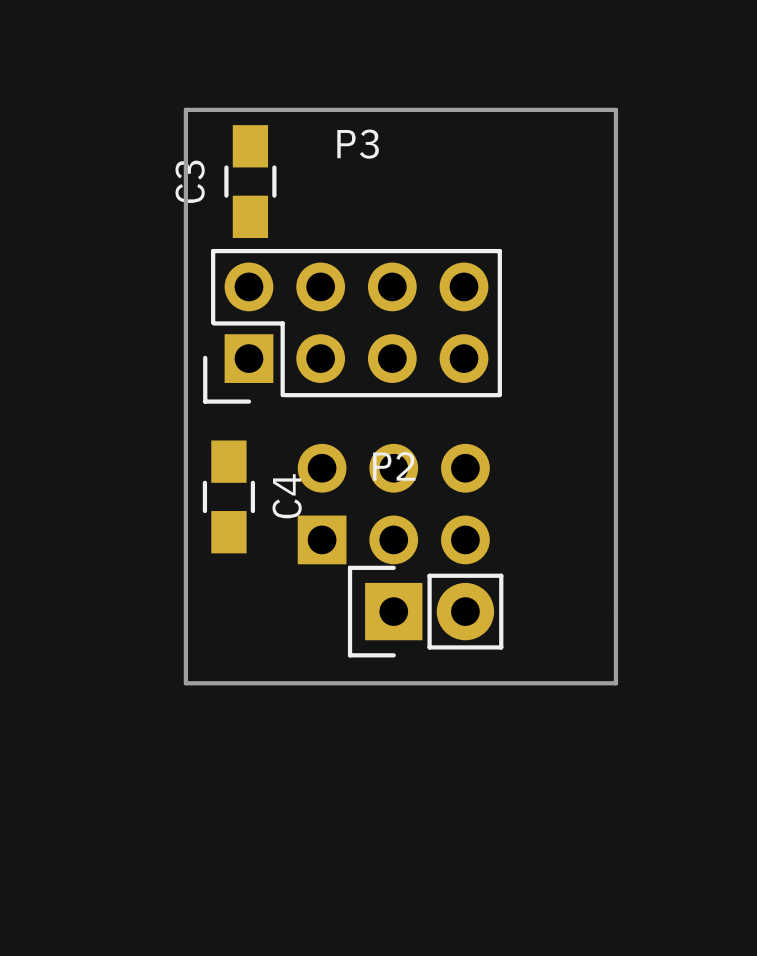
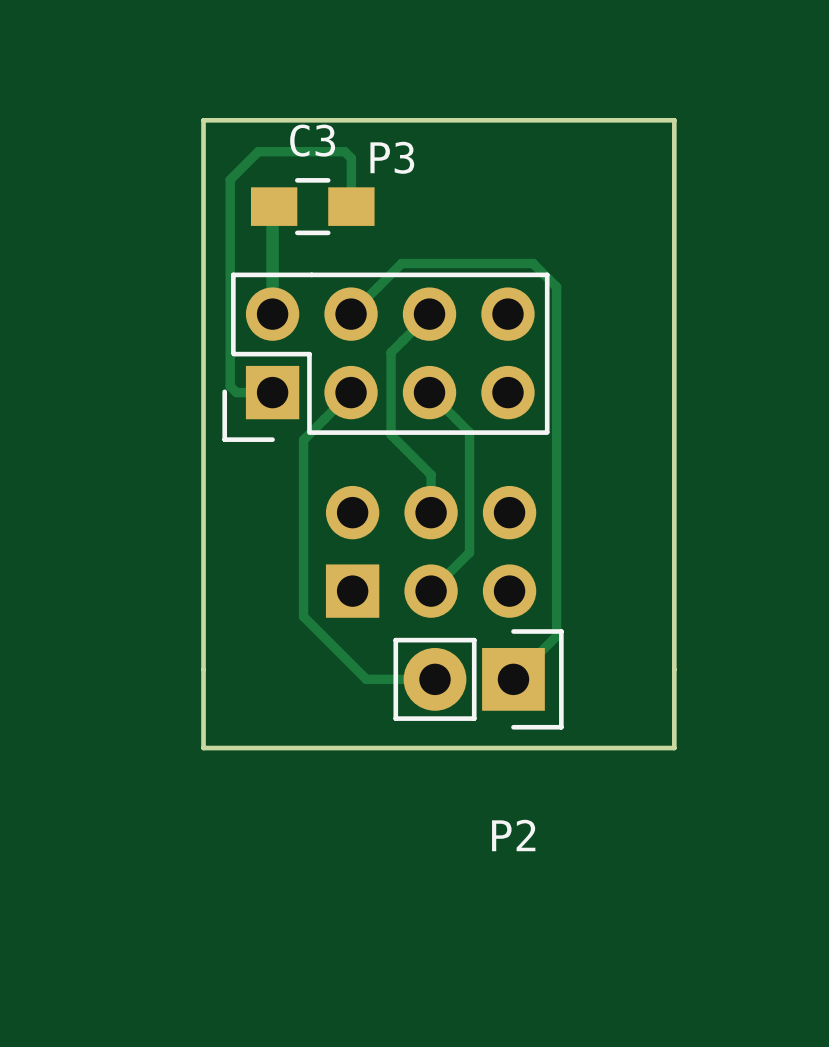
C3 rotation: 0° (250, 181) -> 90° clockwise (312, 206)
track: none -> (274, 206) (272, 208) (272, 314)
track: none -> (351, 206) (351, 158) (344, 151) (258, 151) (230, 179) (230, 386) (236, 392) (272, 392)
track: none -> (351, 314) (401, 263) (533, 263) (556, 287) (556, 636) (513, 679)
track: none -> (429, 314) (391, 352) (391, 434) (431, 474) (431, 512)
track: none -> (351, 392) (303, 440) (303, 616) (366, 679) (435, 679)
track: none -> (429, 392) (469, 432) (469, 552) (431, 591)
C4: (228, 496) -> none
P2 rotation: 0° (425, 611) -> 180° (478, 679)

